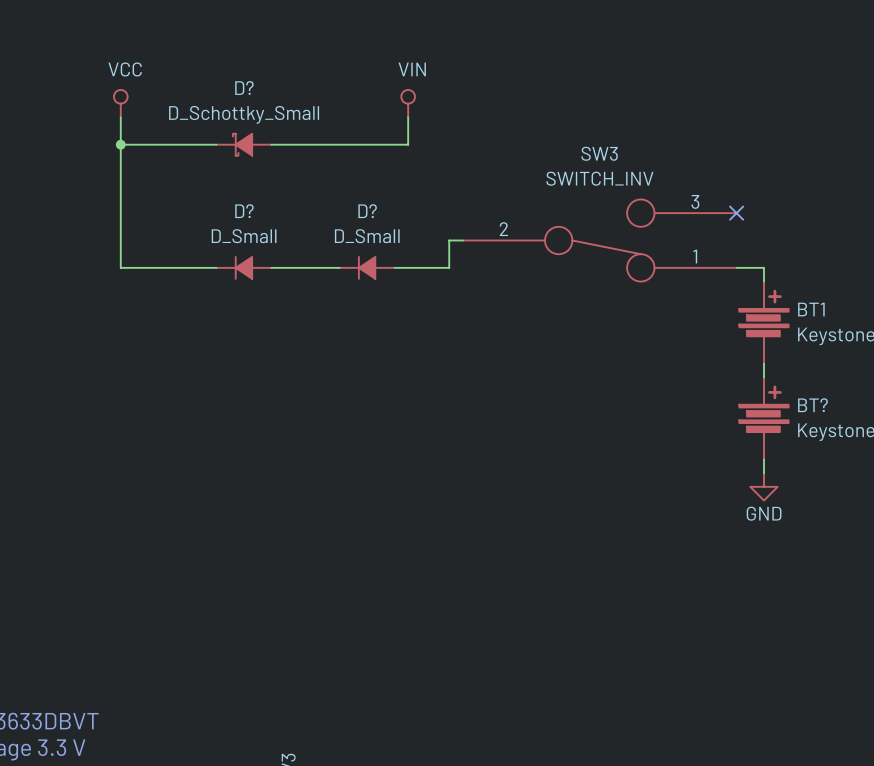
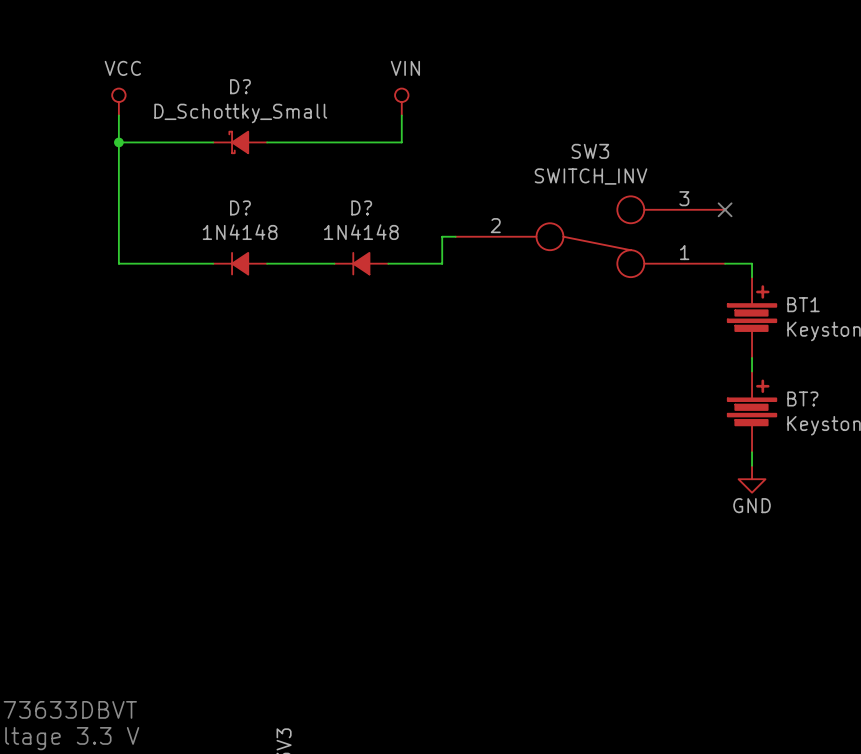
D? value: D_Small (244, 236) -> 1N4148 (240, 232)
D? value: D_Small (367, 236) -> 1N4148 (361, 232)

